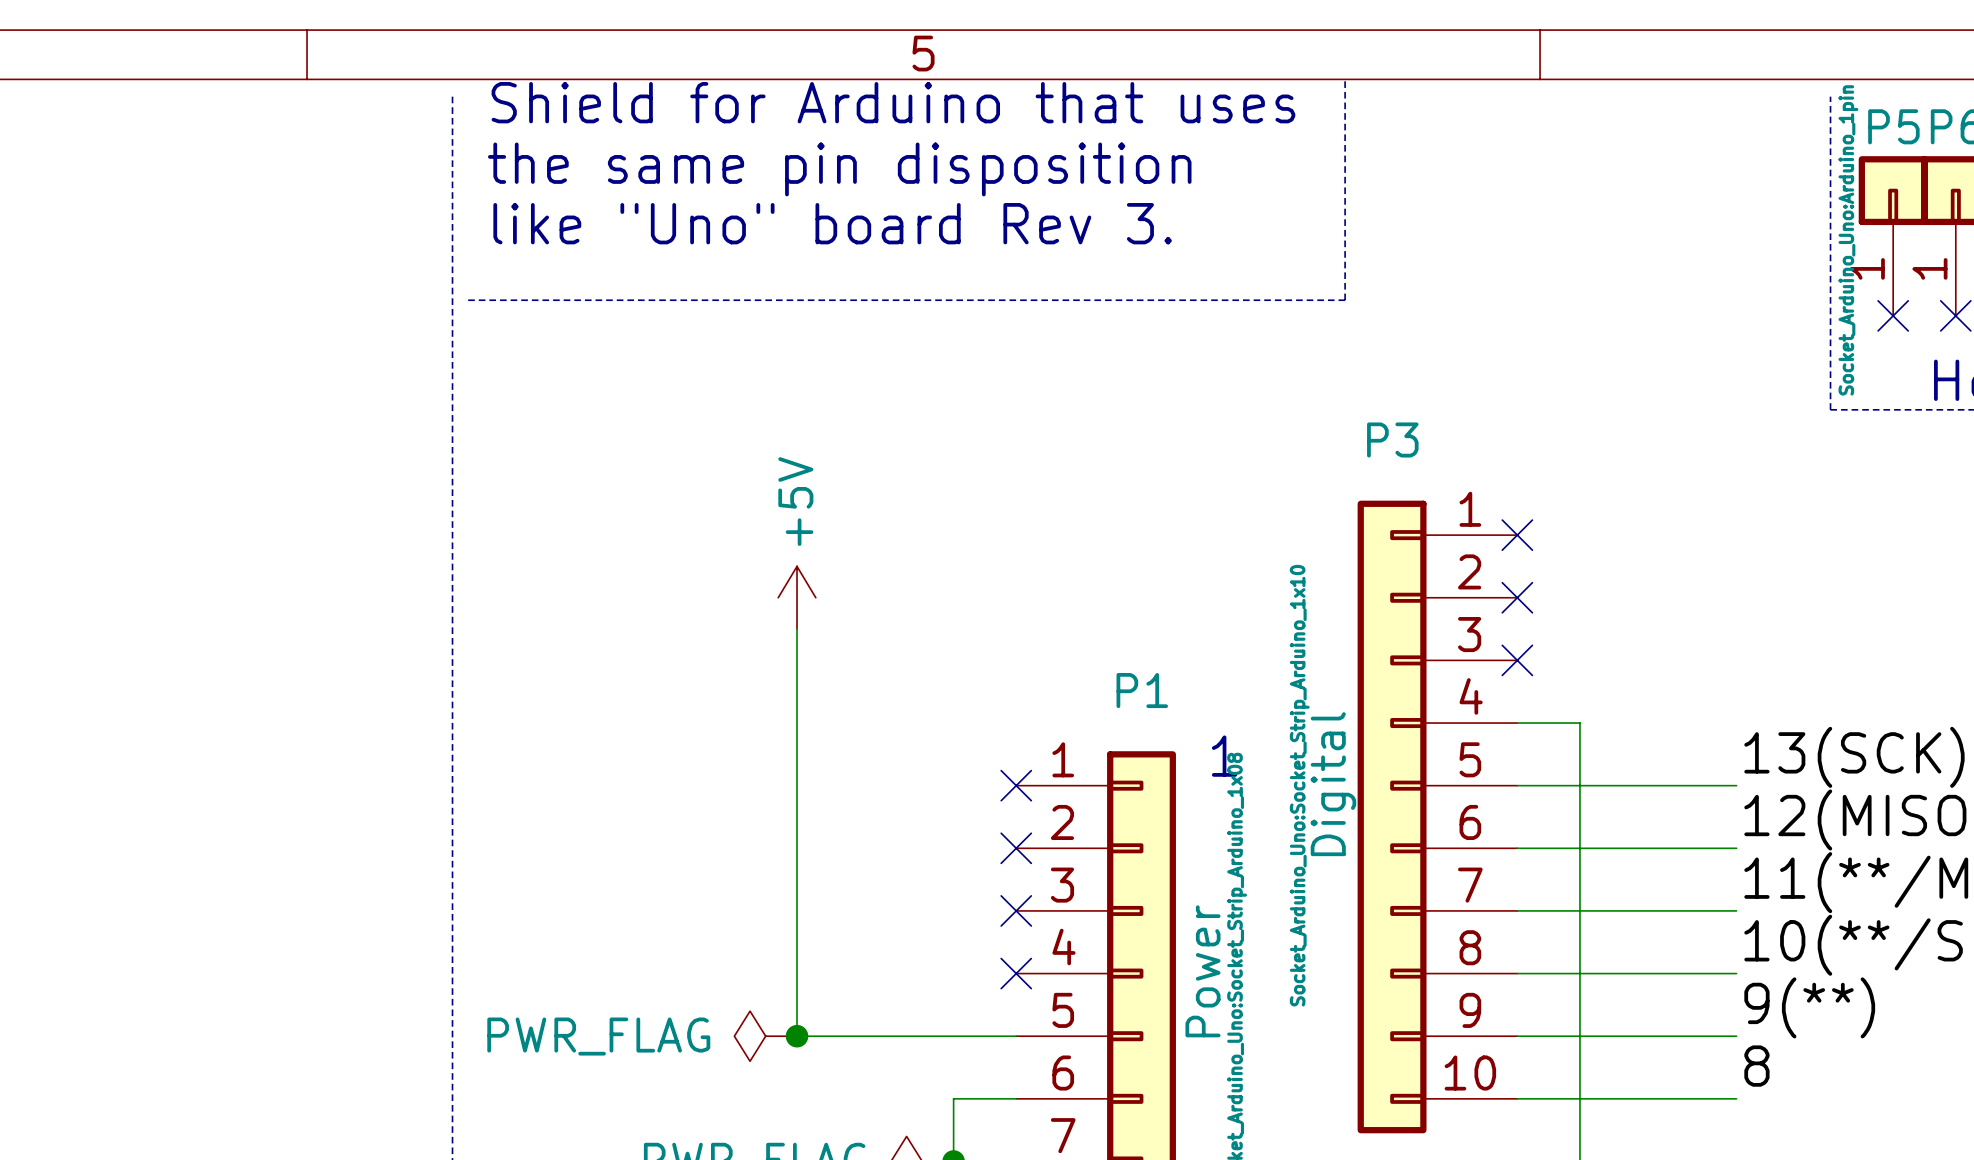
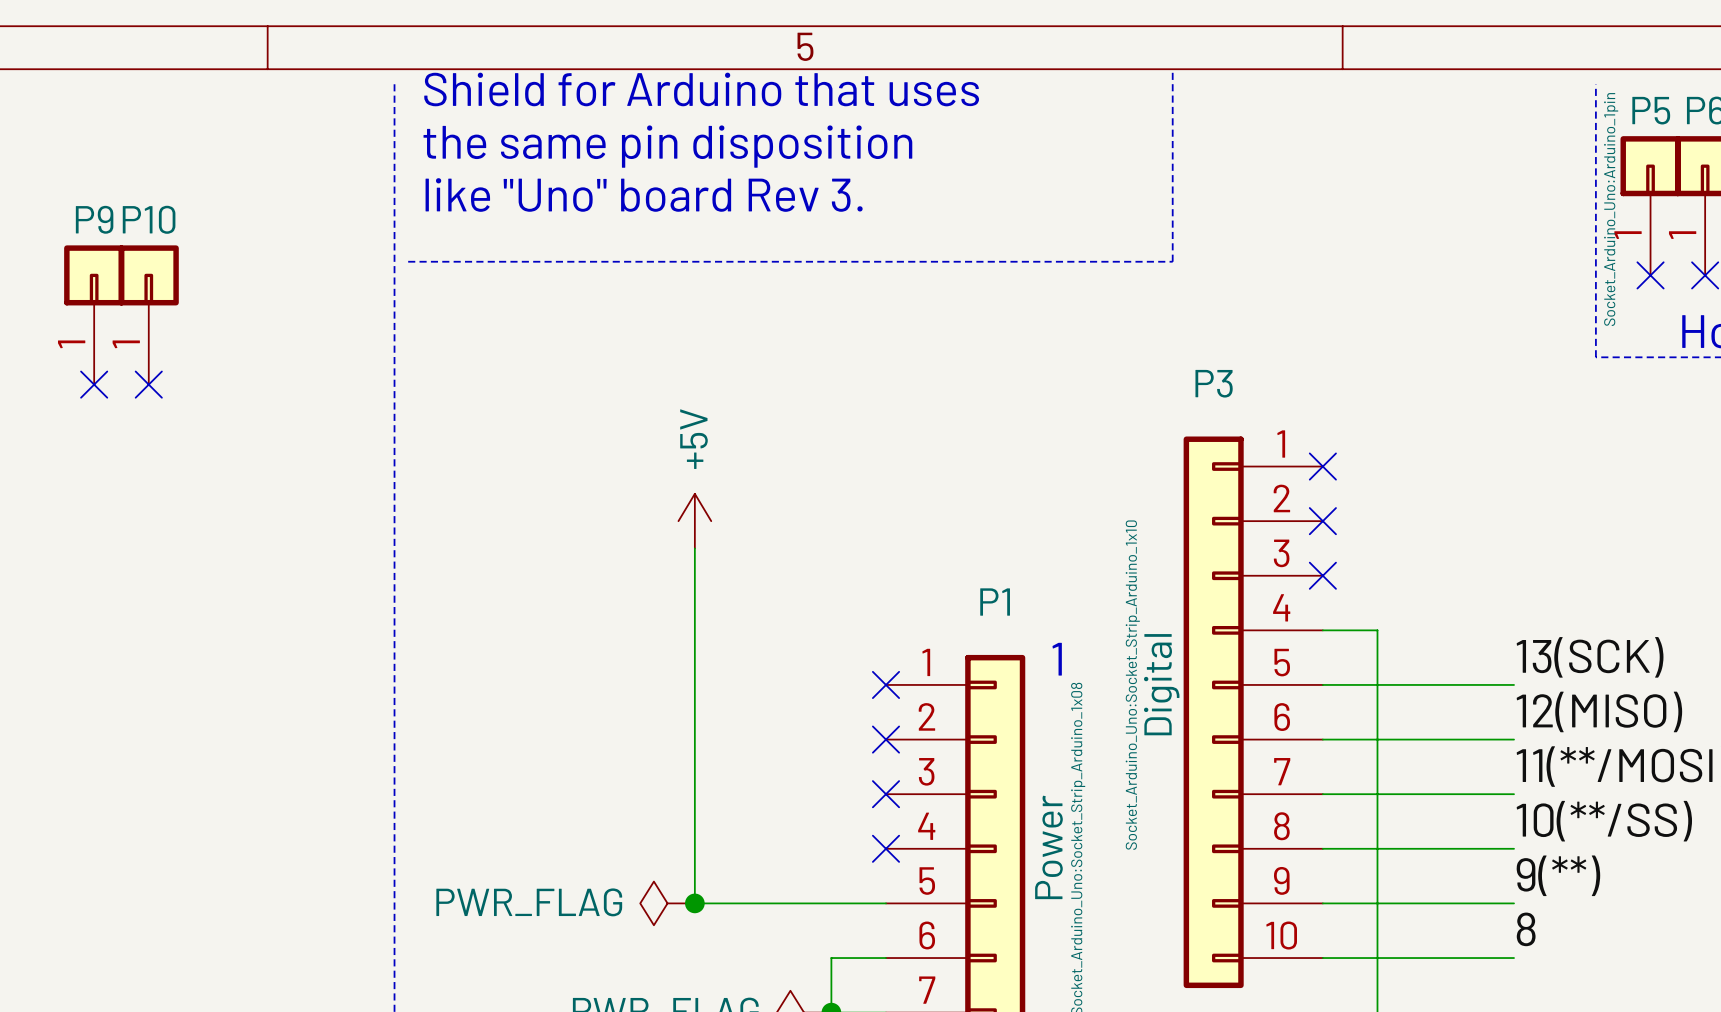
P9: none -> (94, 314)
P10: none -> (148, 314)
no-connect mark: none -> (94, 384)
no-connect mark: none -> (148, 384)

